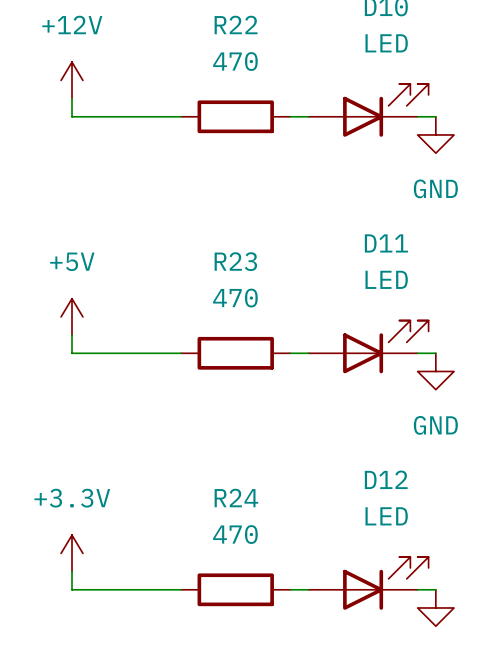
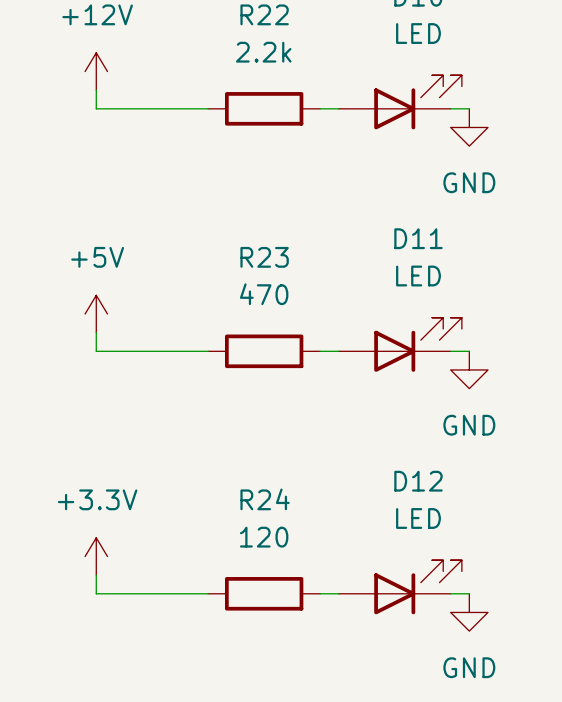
R22 value: 470 (235, 61) -> 2.2k (263, 52)
R24 value: 470 (235, 534) -> 120 (264, 537)

